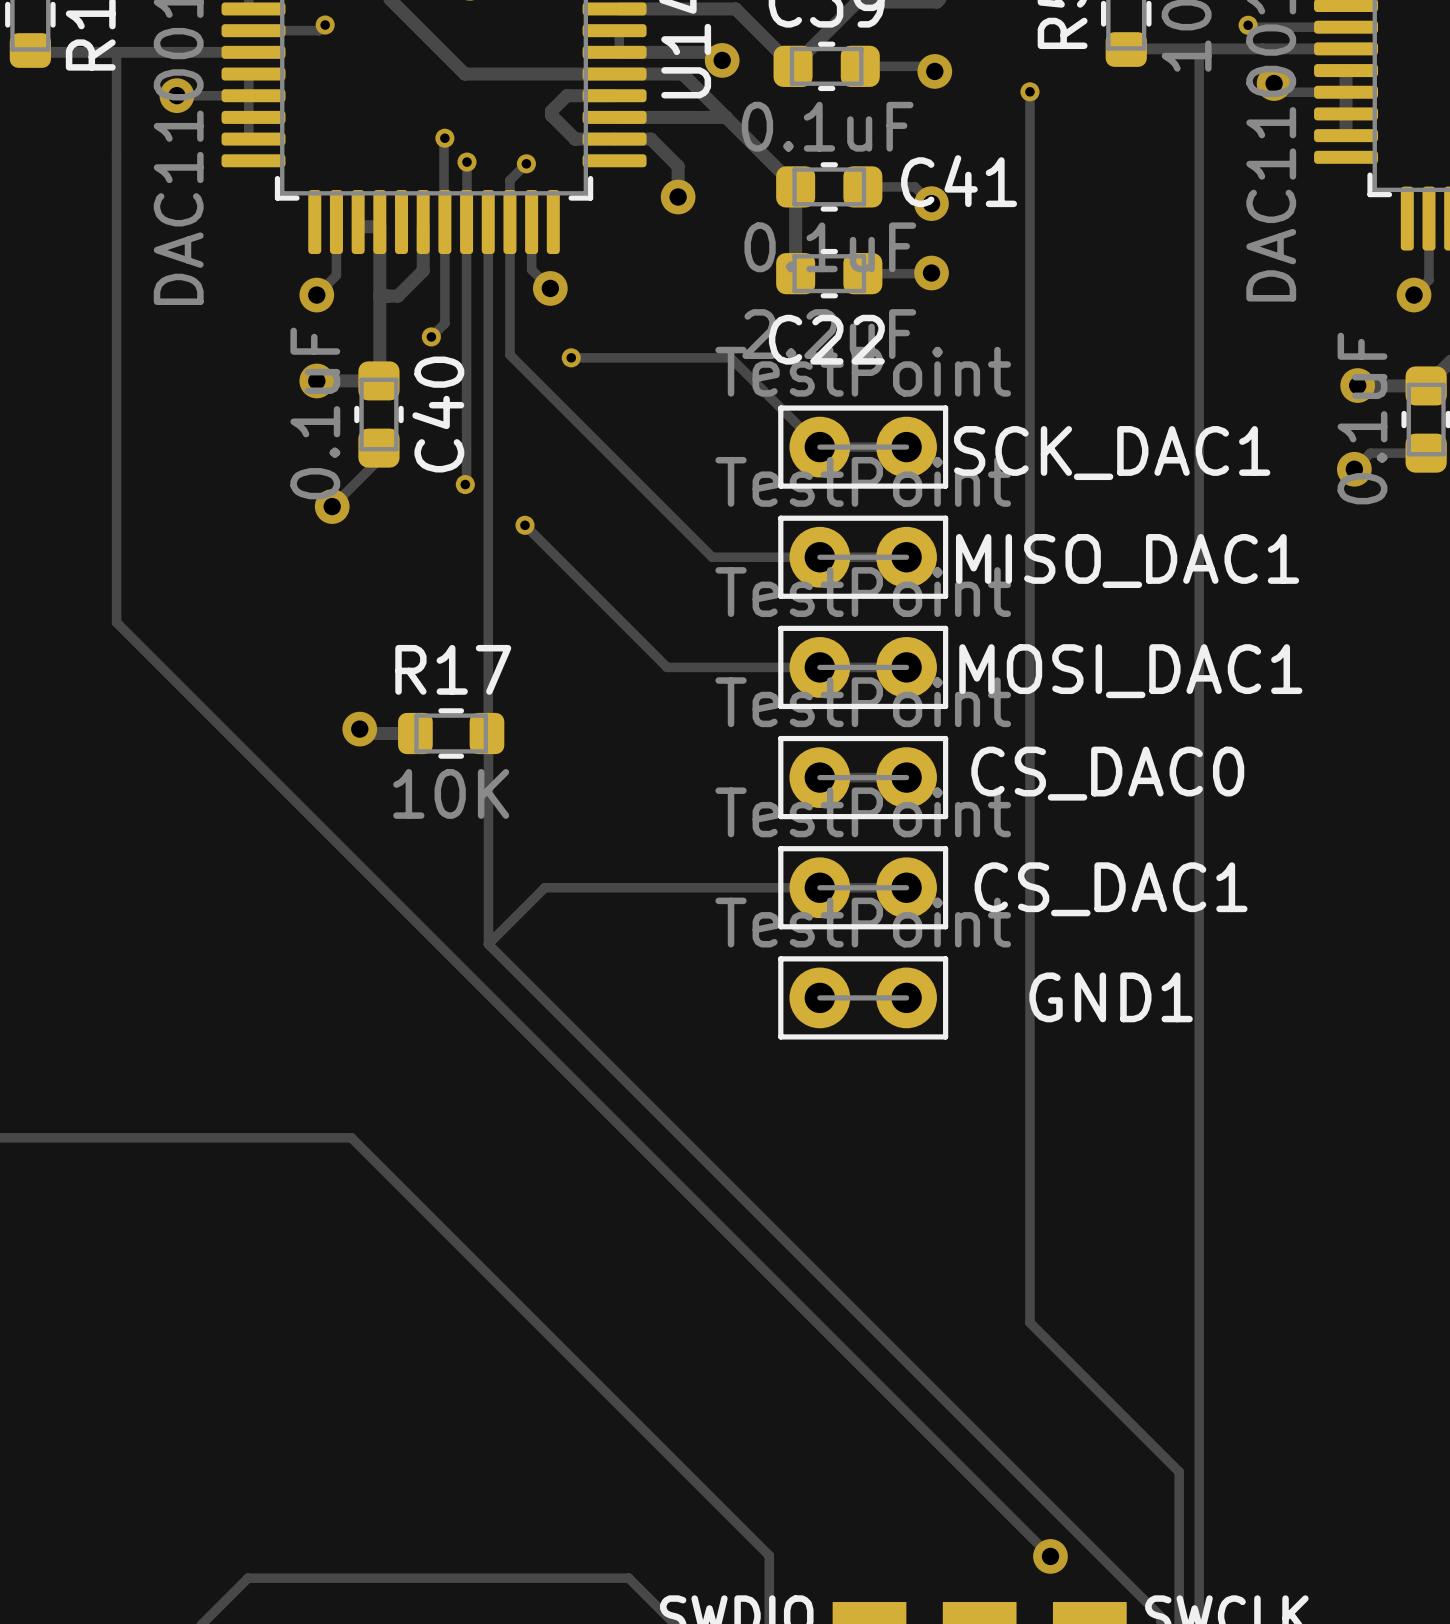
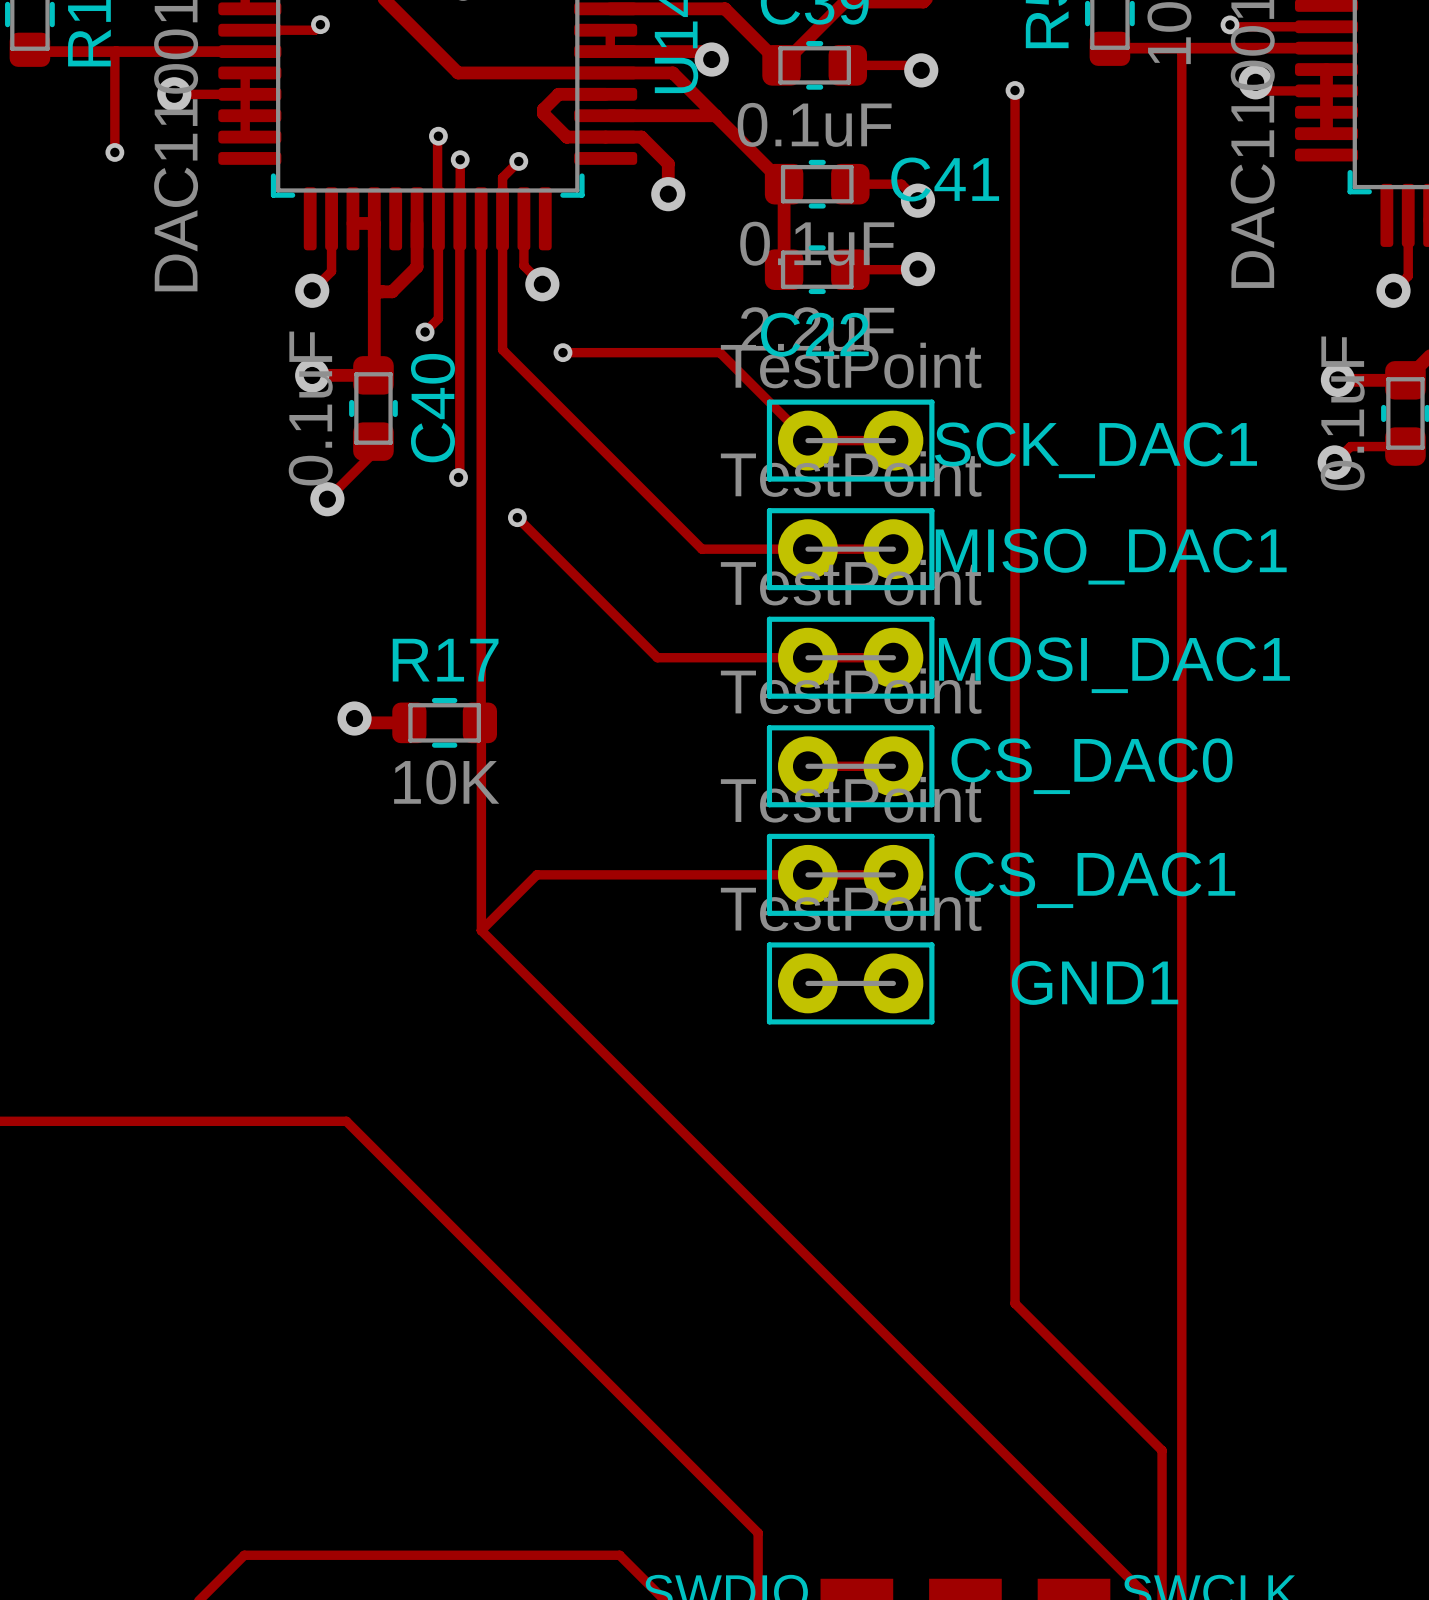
track: (116, 154) (116, 622) (1050, 1556) -> none
via: none -> (114, 152)
via: (1050, 1556) -> none

